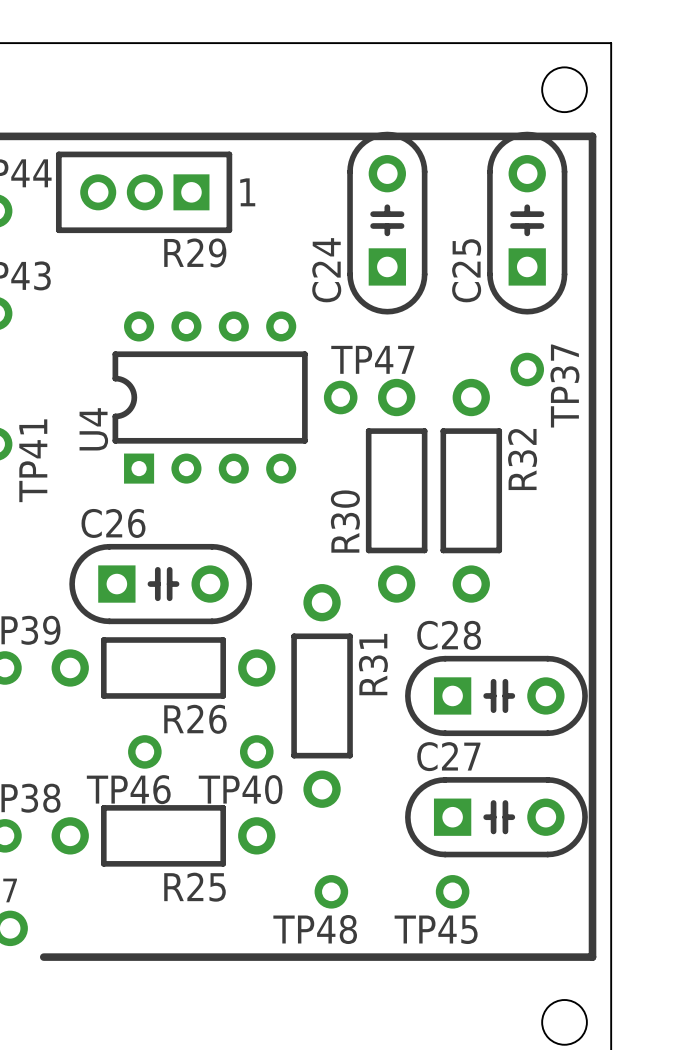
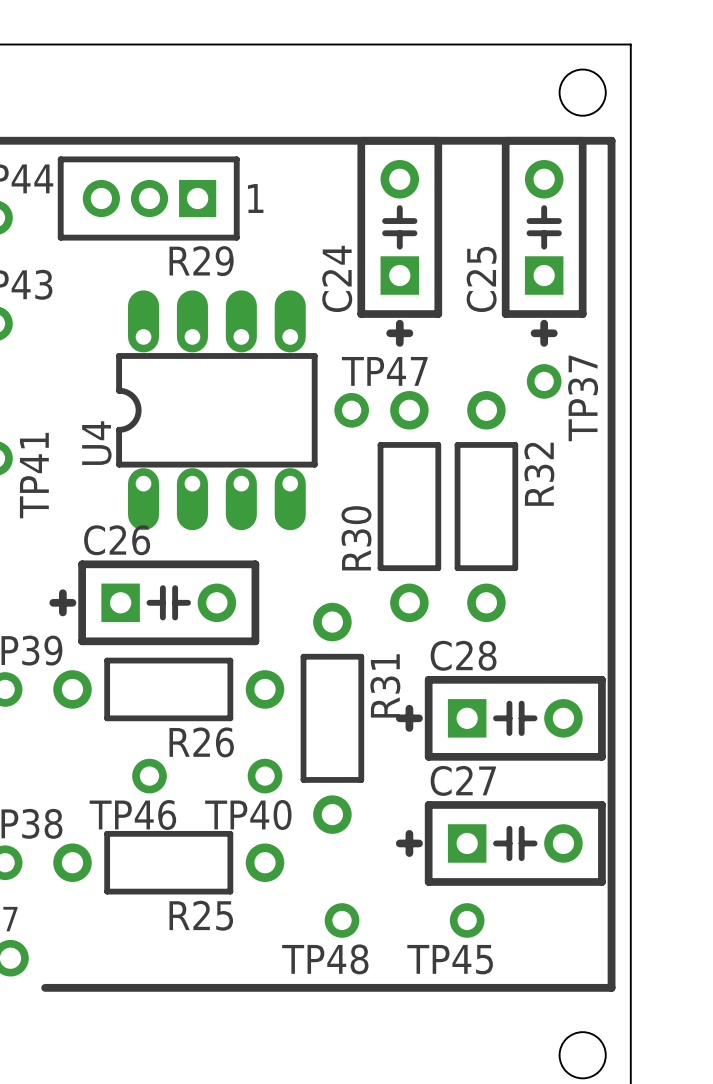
C24 footprint: [347, 131, 428, 315] -> [357, 136, 443, 347]
C25 footprint: [487, 131, 568, 315] -> [501, 136, 587, 347]
U4 footprint: [112, 311, 308, 484] -> [116, 290, 318, 531]
C26 footprint: [69, 543, 253, 625] -> [49, 560, 260, 646]
C28 footprint: [405, 655, 588, 737] -> [395, 675, 606, 761]
C27 footprint: [405, 777, 588, 858] -> [395, 801, 606, 886]

